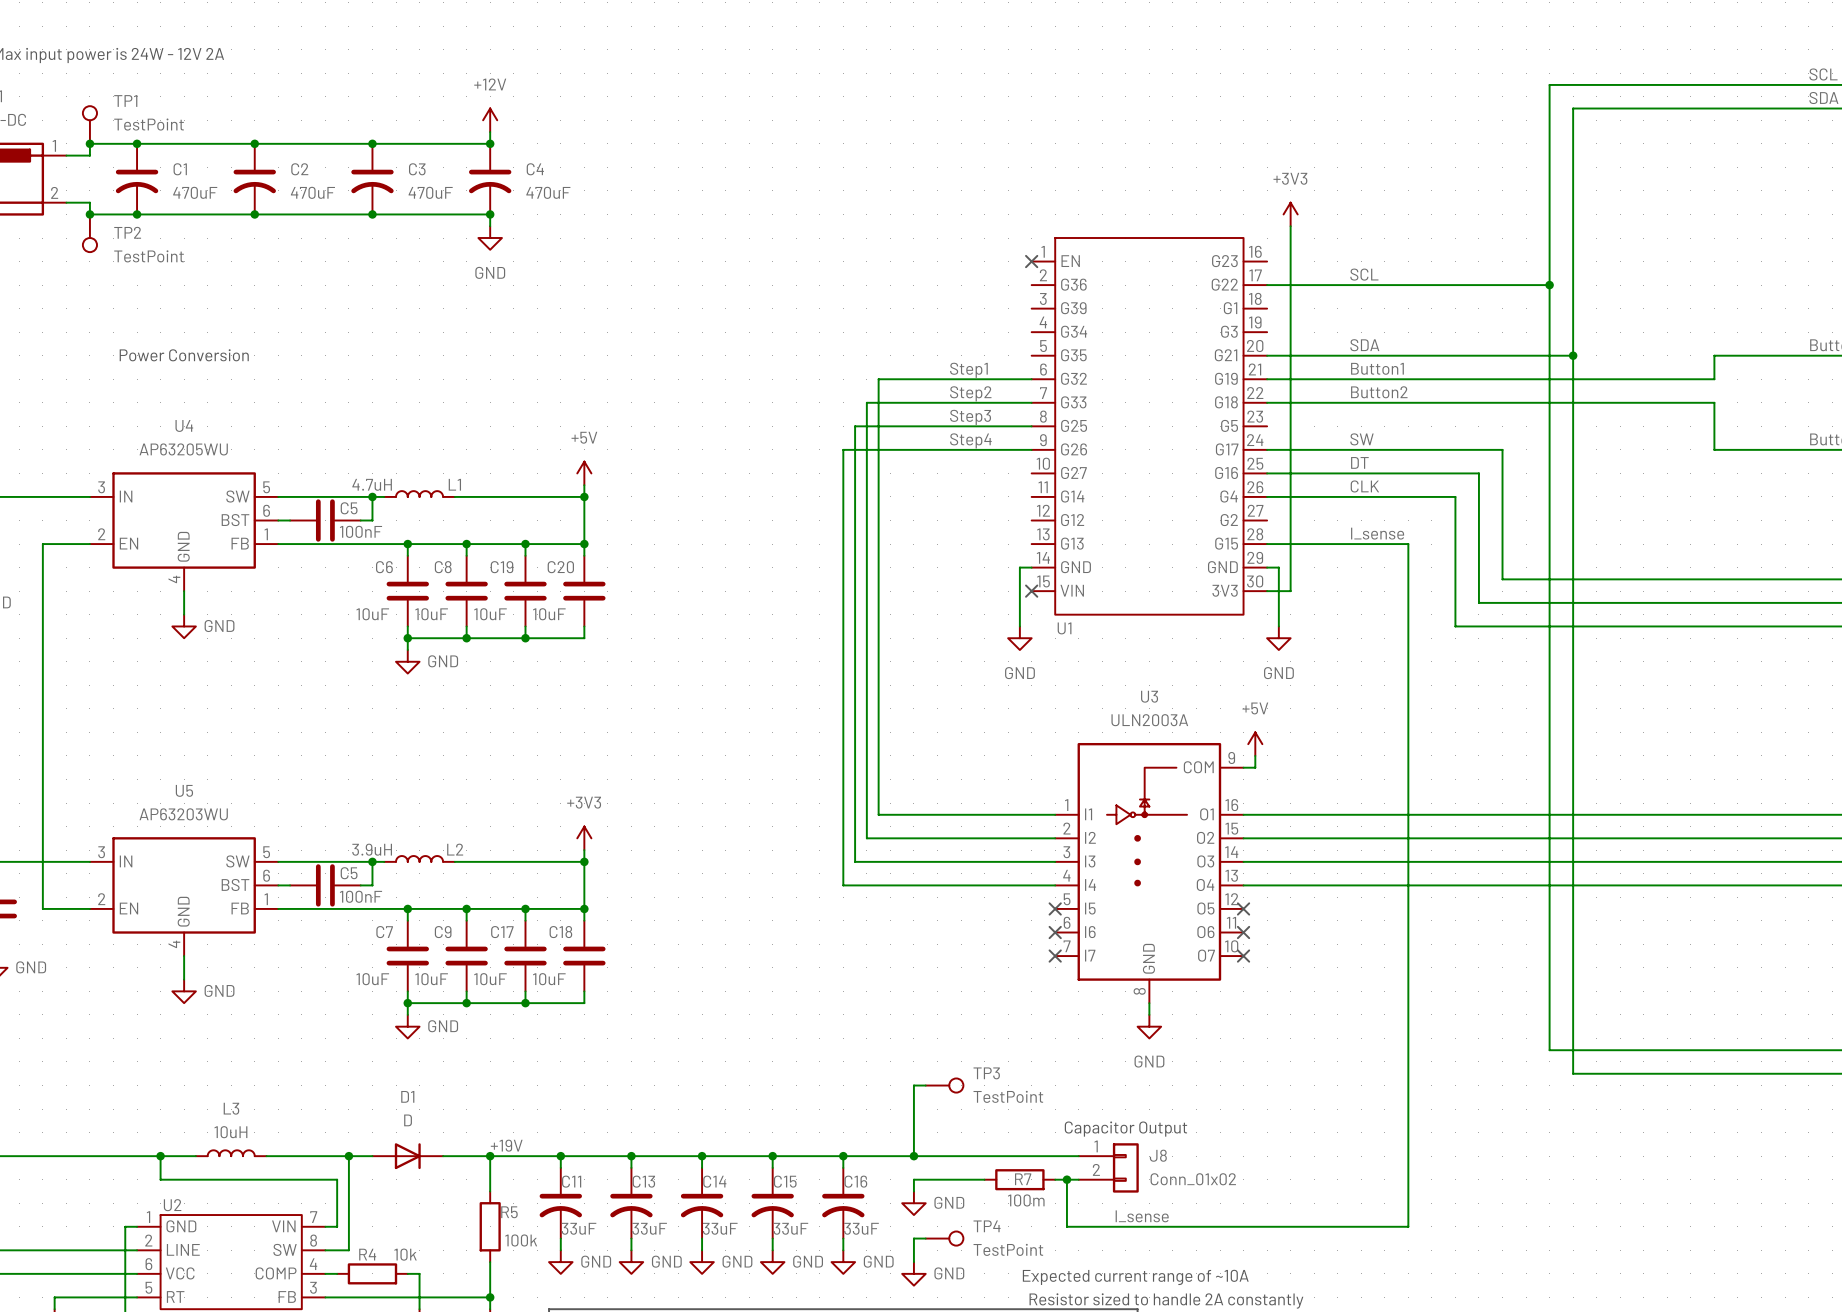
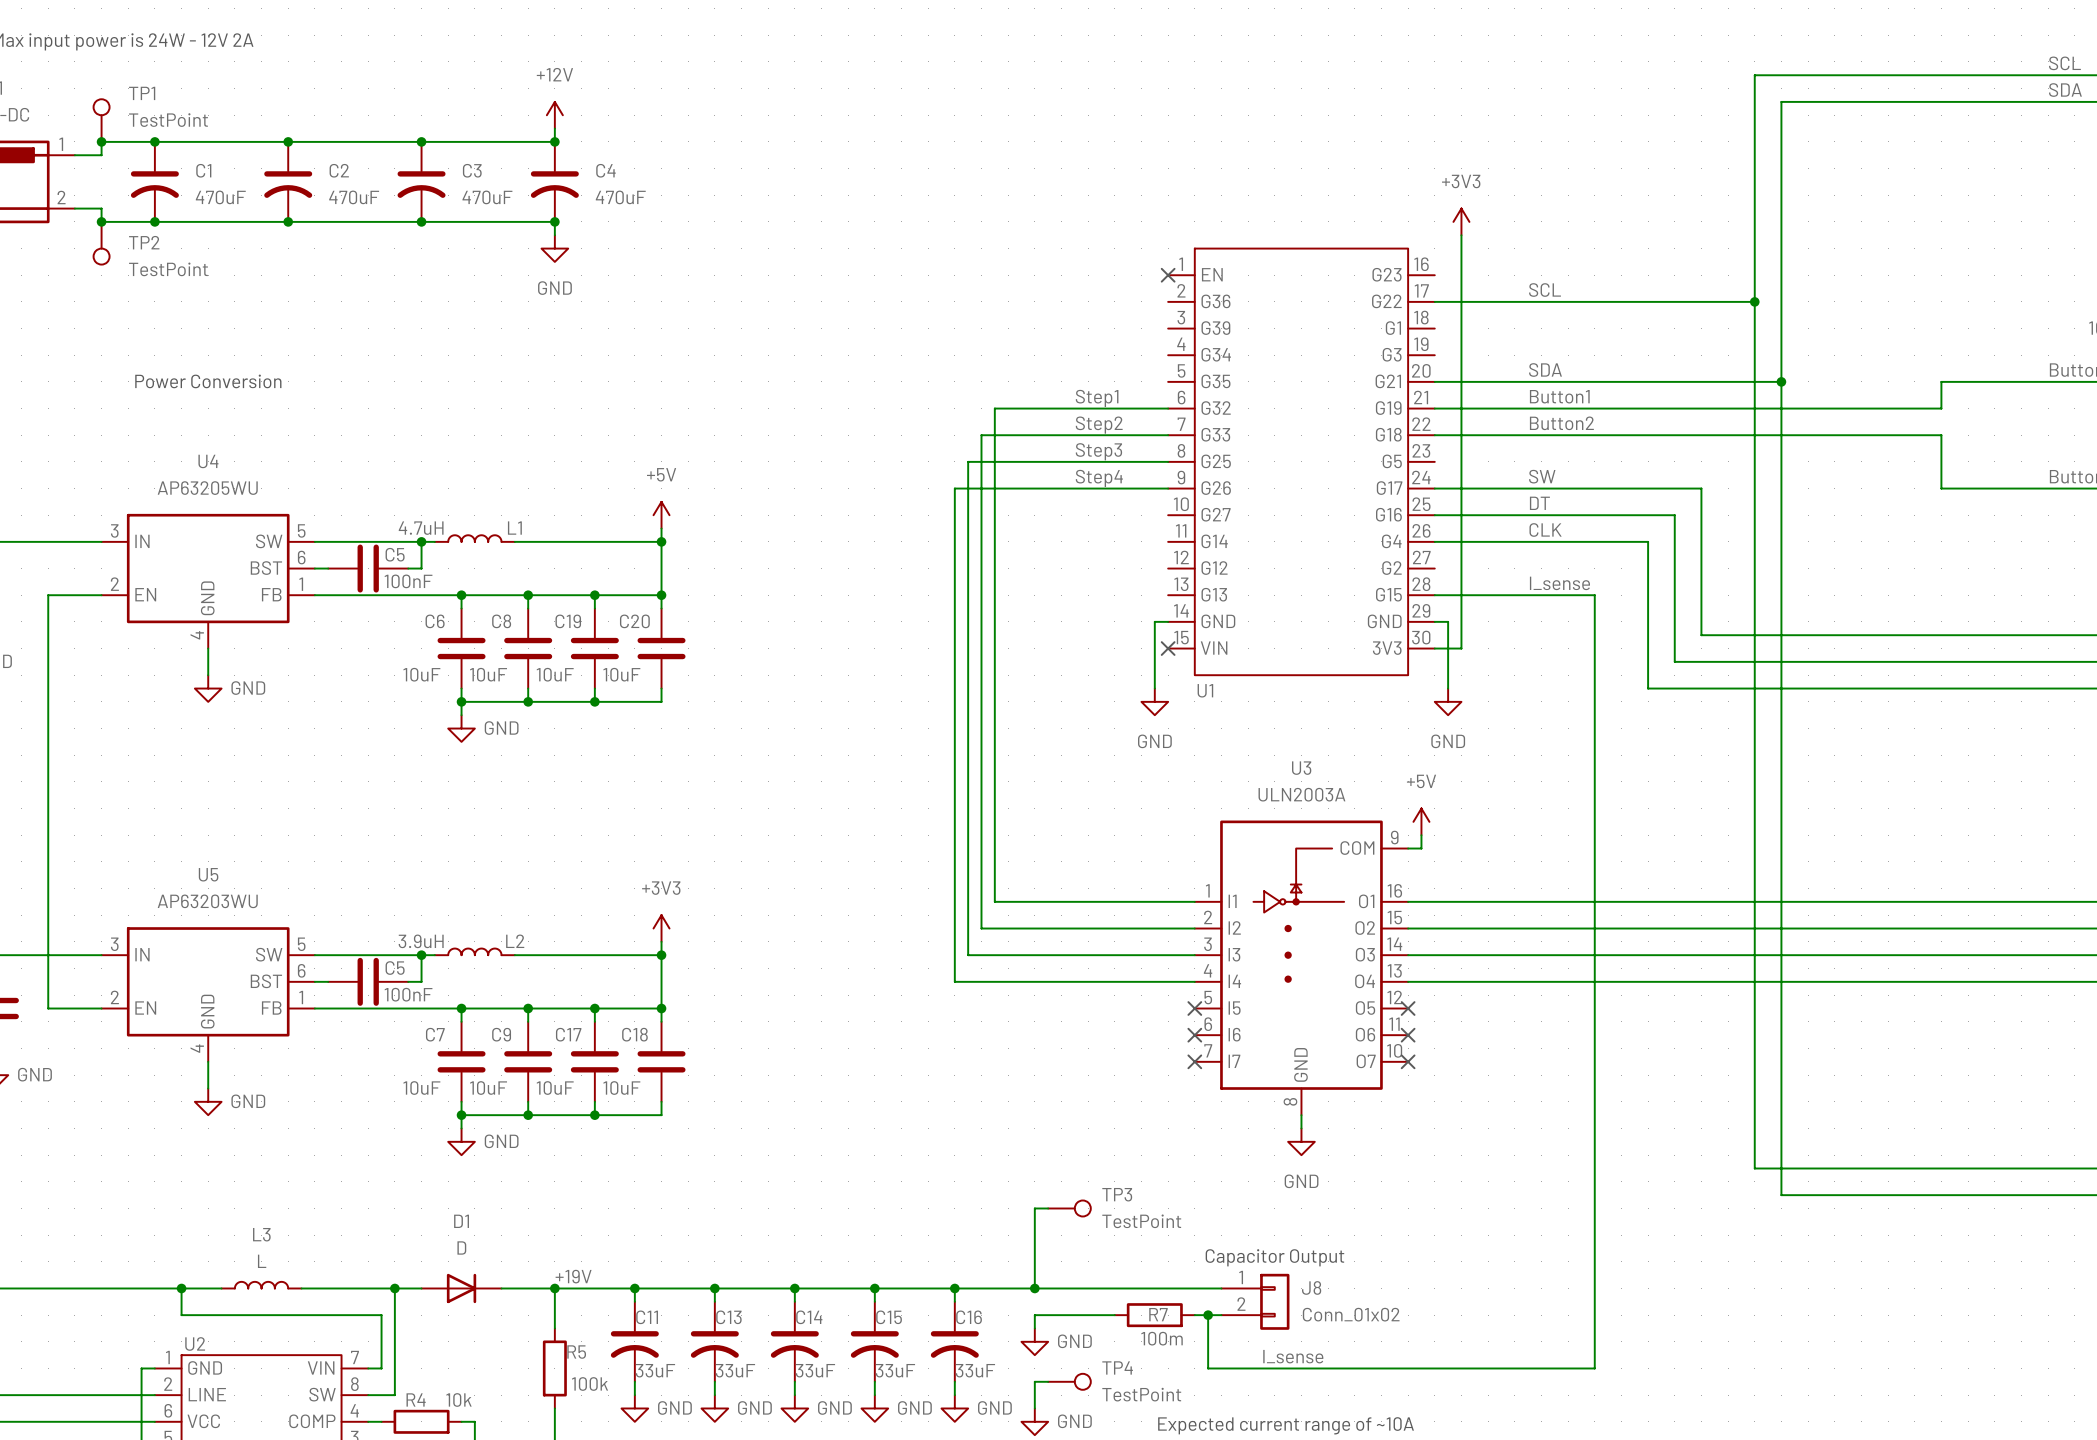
L3 value: 10uH (230, 1132) -> L (262, 1261)

